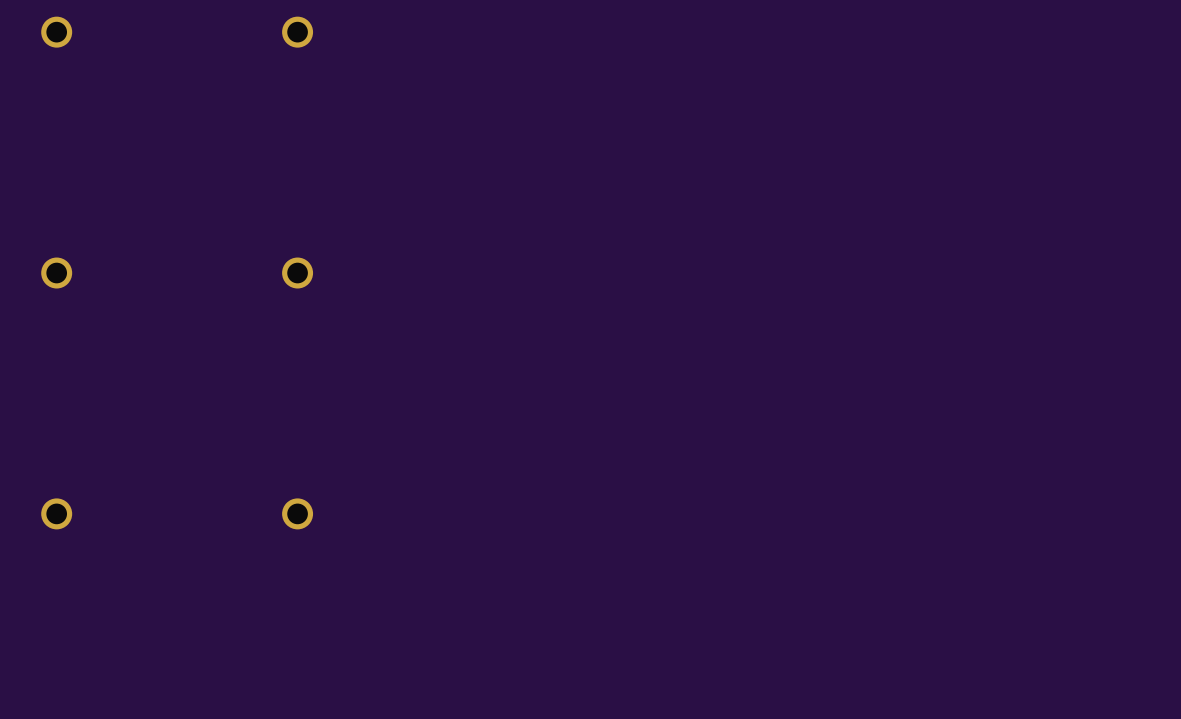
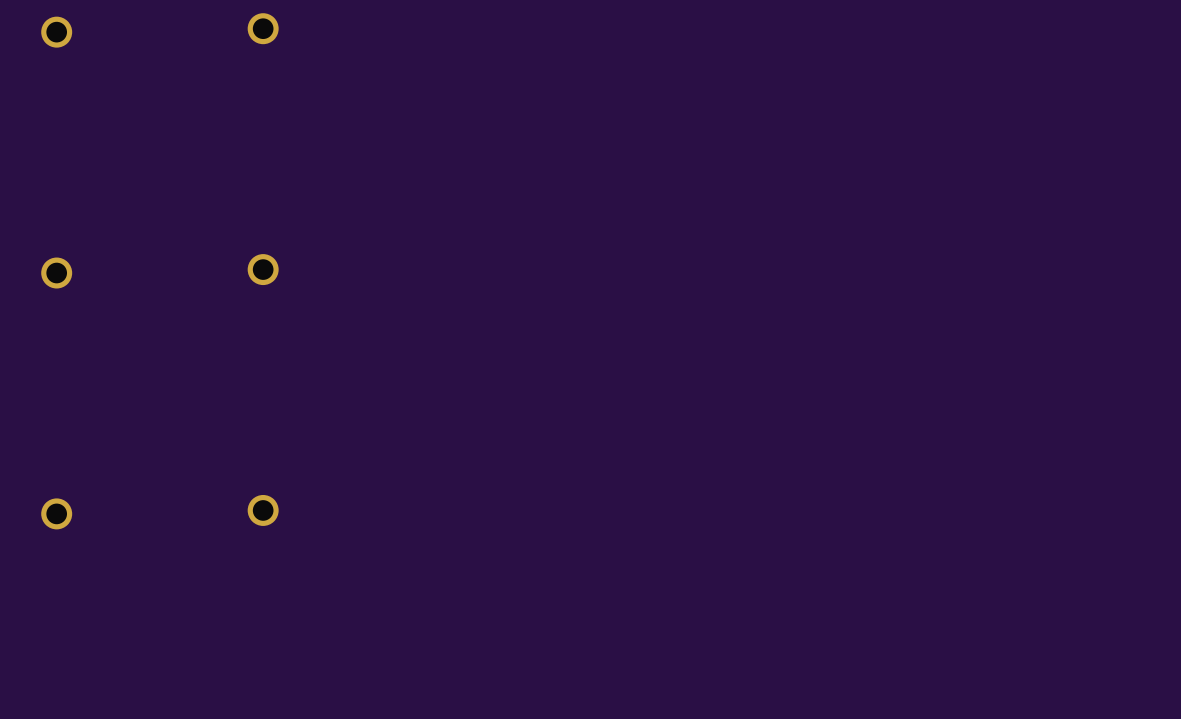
via position: (297, 32) -> (263, 28)
via position: (297, 273) -> (263, 269)
via position: (297, 513) -> (263, 510)

